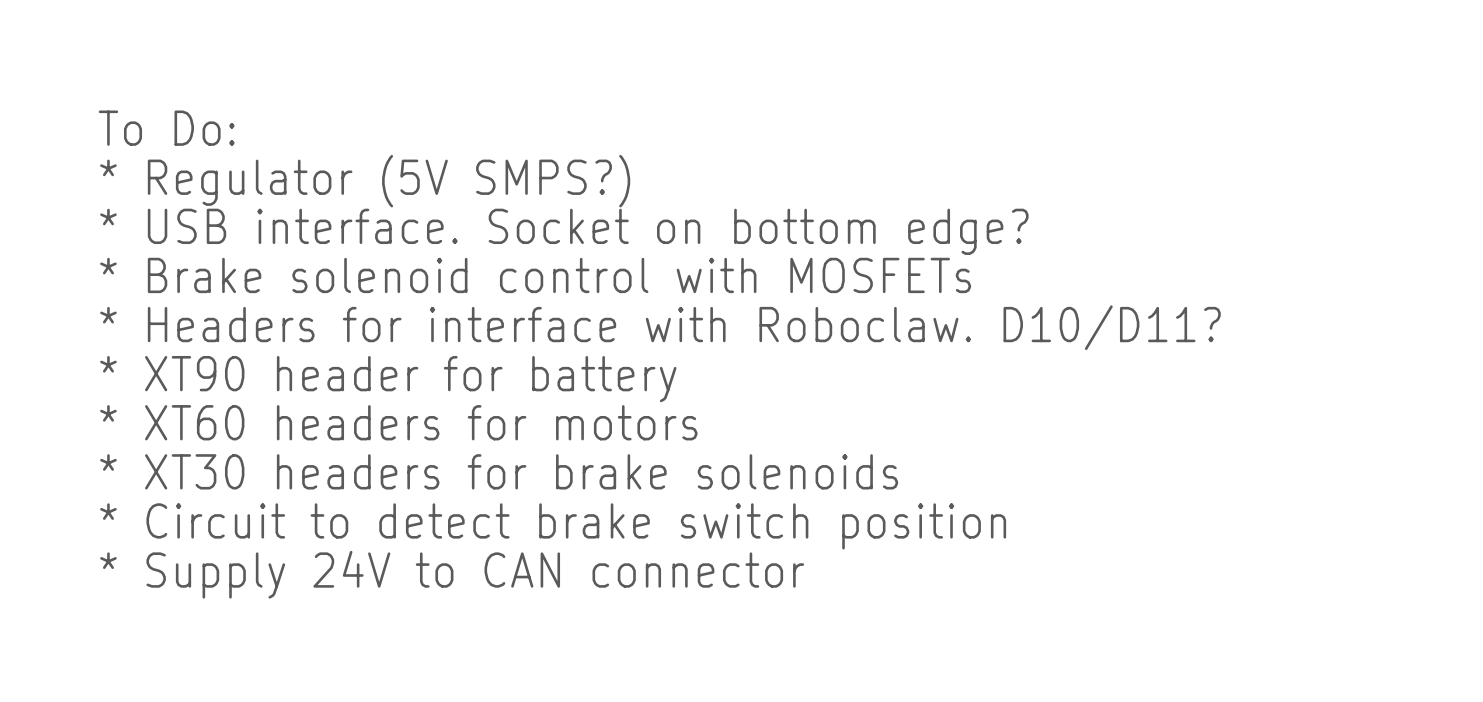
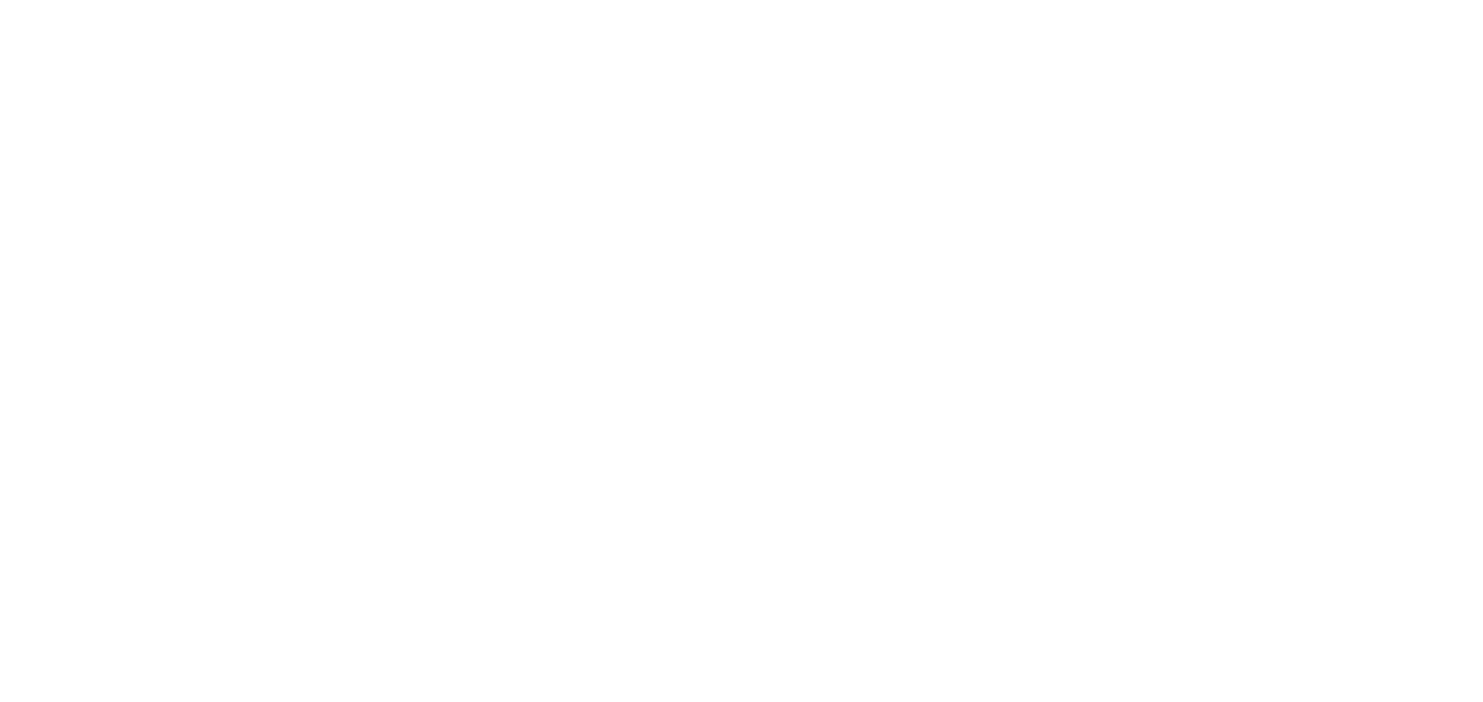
text: To Do: (166, 128) -> none
text: * Regulator (5V SMPS?) (365, 181) -> none
text: * USB interface. Socket on bottom edge? (564, 231) -> none
text: * Brake solenoid control with MOSFETs (535, 275) -> none
text: * Headers for interface with Roboclaw. D10/D11? (660, 327) -> none
text: * XT90 header for battery (388, 379) -> none
text: * XT60 headers for motors (398, 422) -> none
text: * XT30 headers for brake solenoids (499, 471) -> none
text: * Circuit to detect brake switch position (553, 526) -> none
text: * Supply 24V to CAN connector (452, 574) -> none

